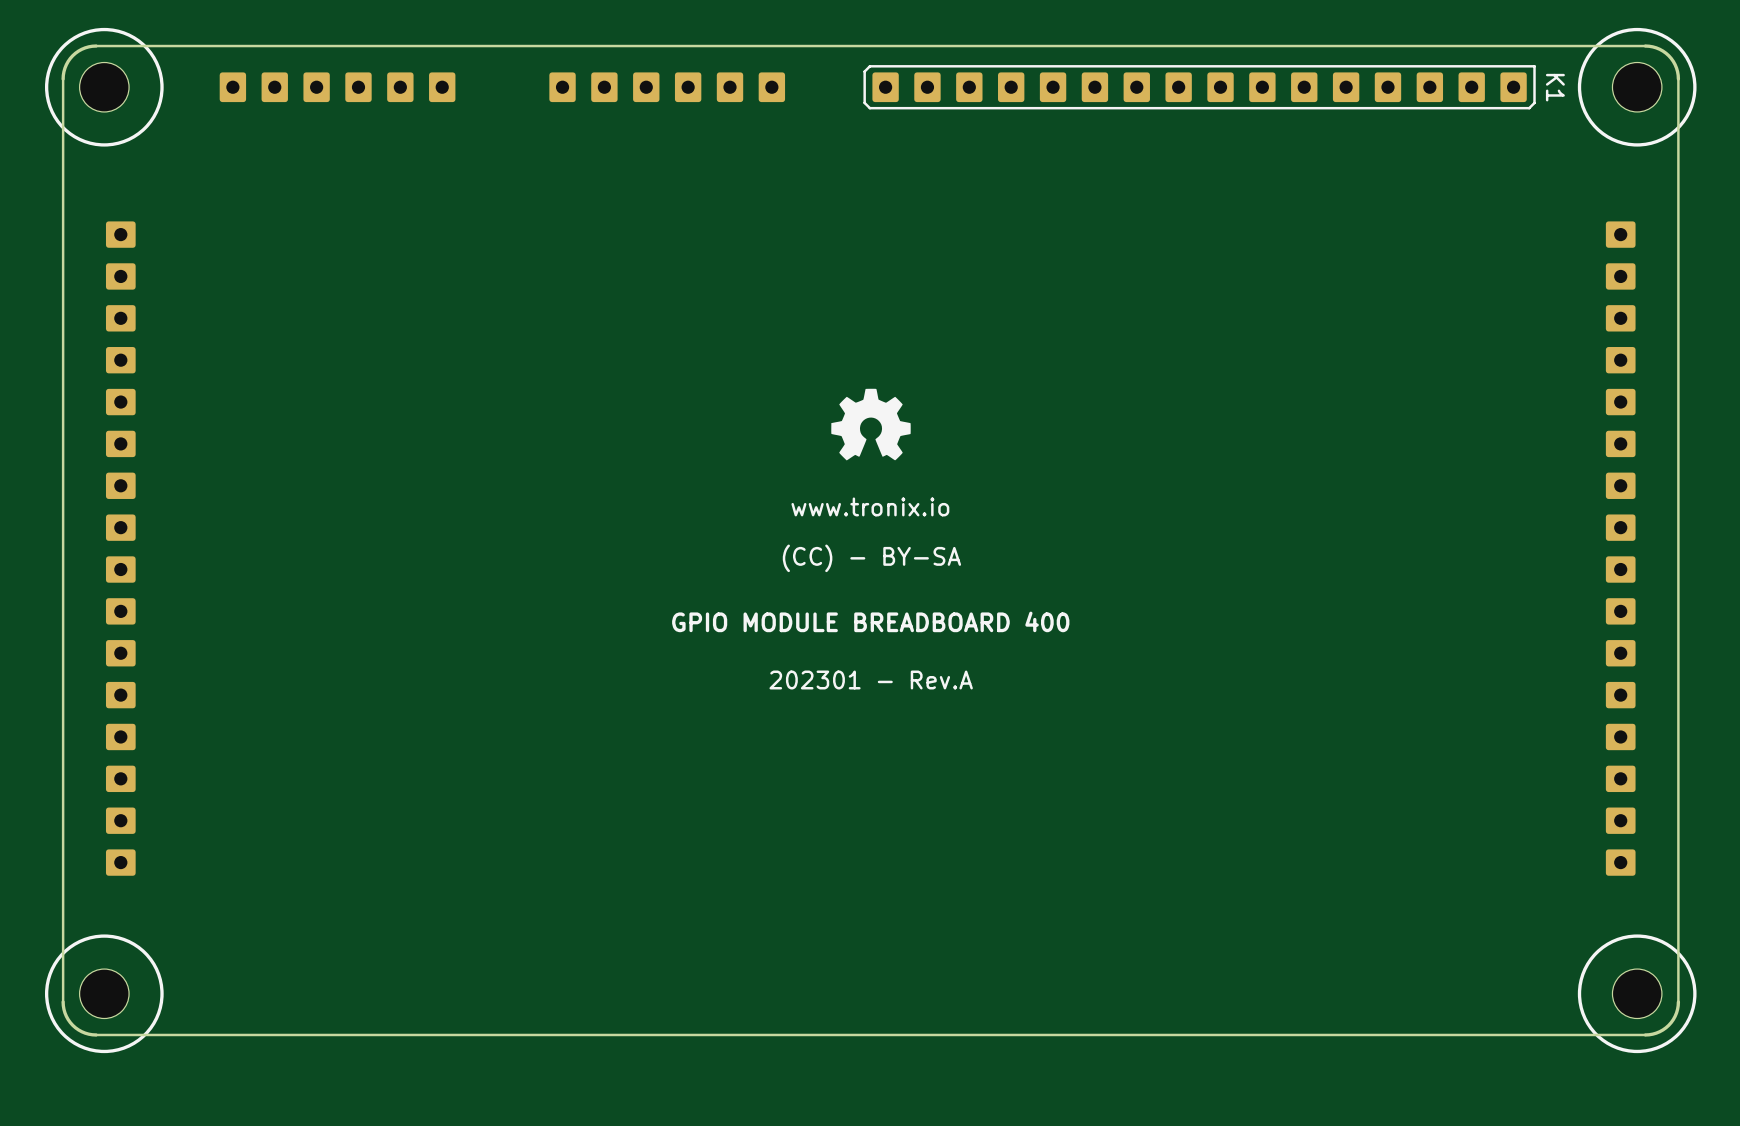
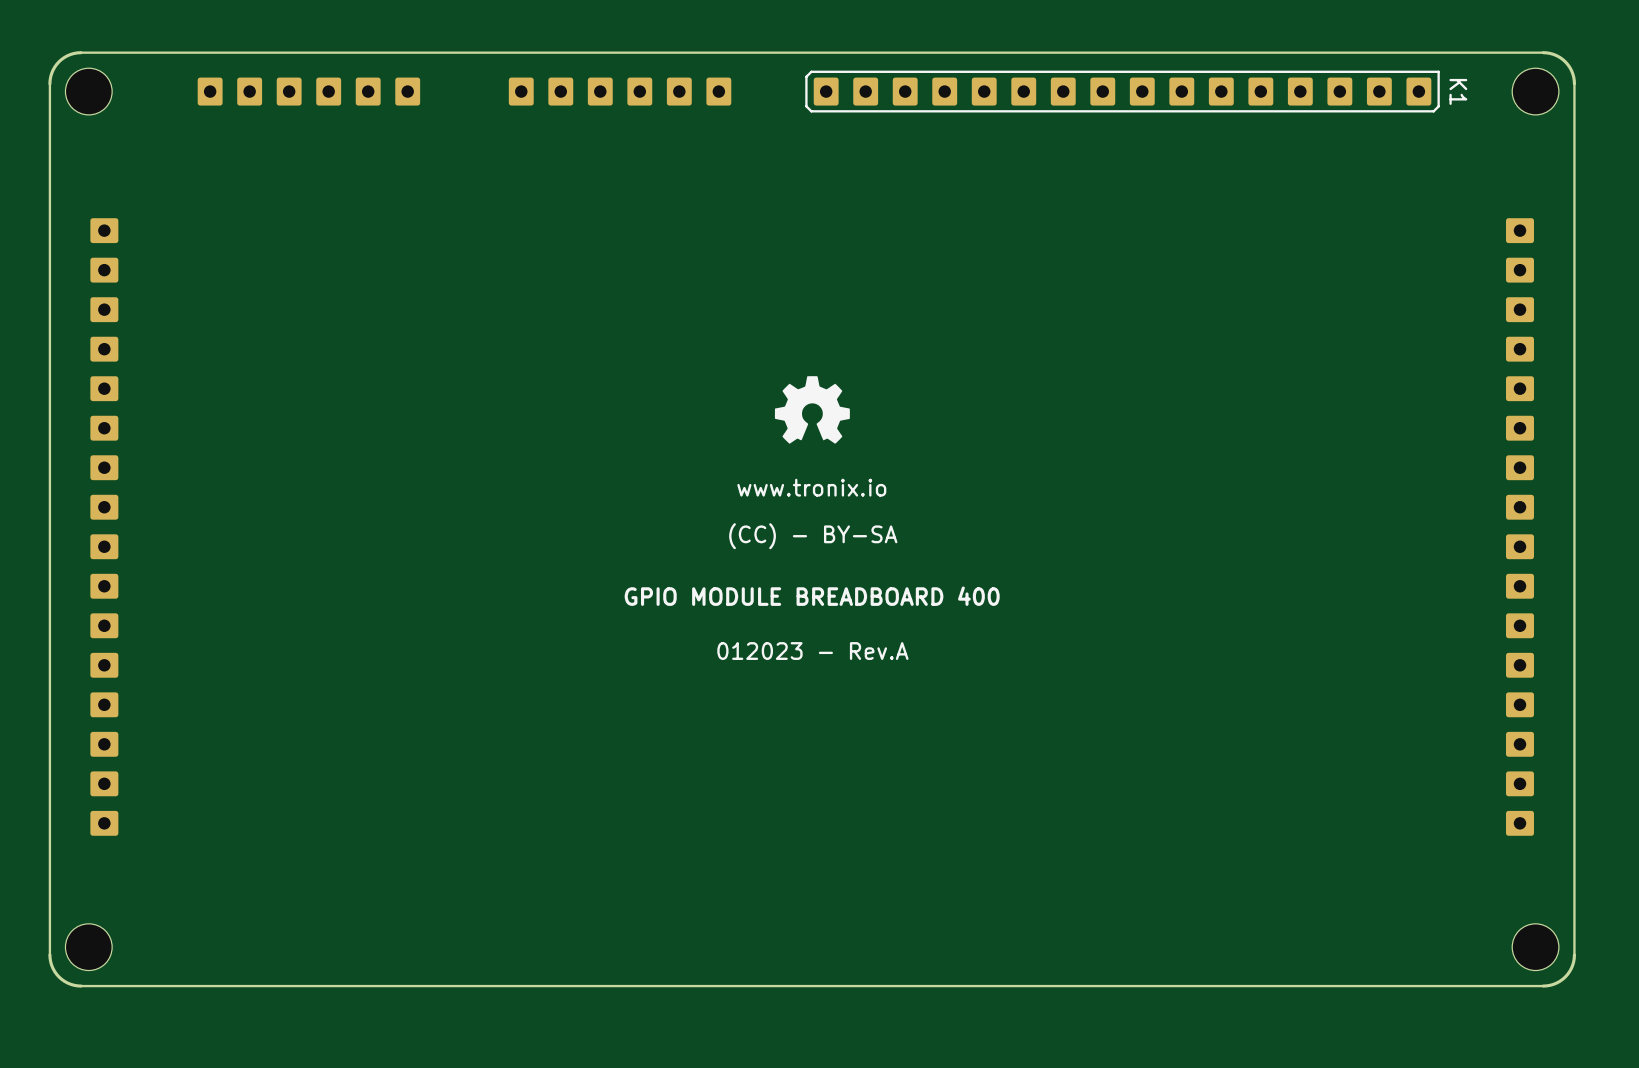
part footprint: [44, 27, 164, 147] -> [65, 68, 113, 115]
part footprint: [1577, 27, 1697, 147] -> [1512, 68, 1559, 115]
text: 202301 - Rev.A (871, 679) -> 012023 - Rev.A (812, 651)
part footprint: [44, 934, 164, 1054] -> [65, 923, 113, 971]
part footprint: [1577, 934, 1697, 1054] -> [1512, 923, 1559, 971]

